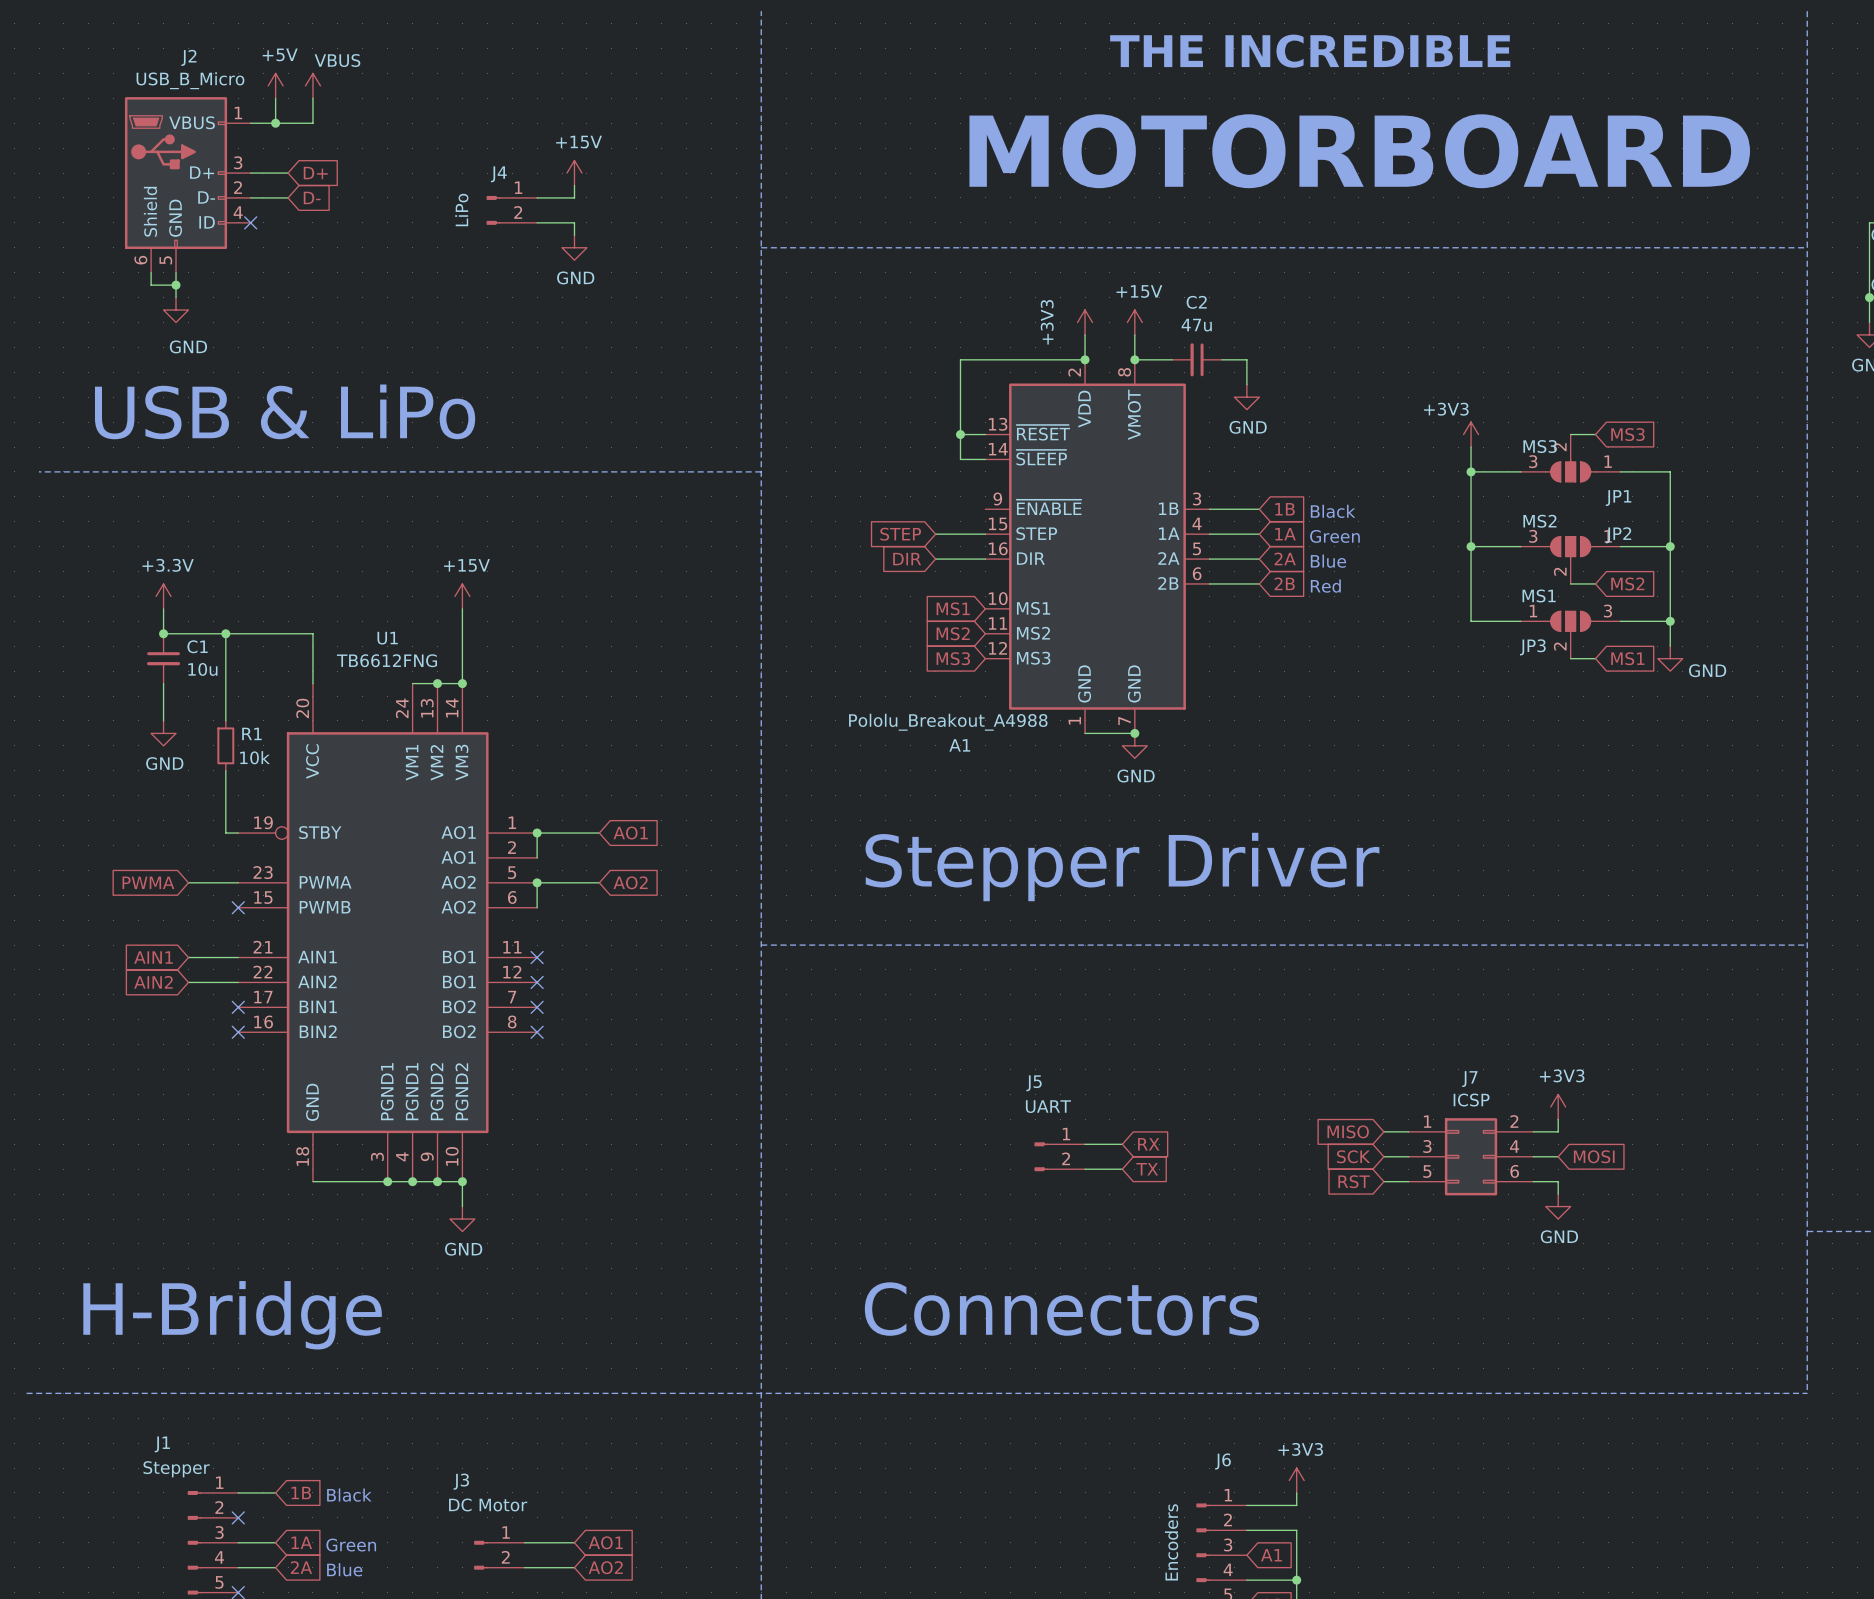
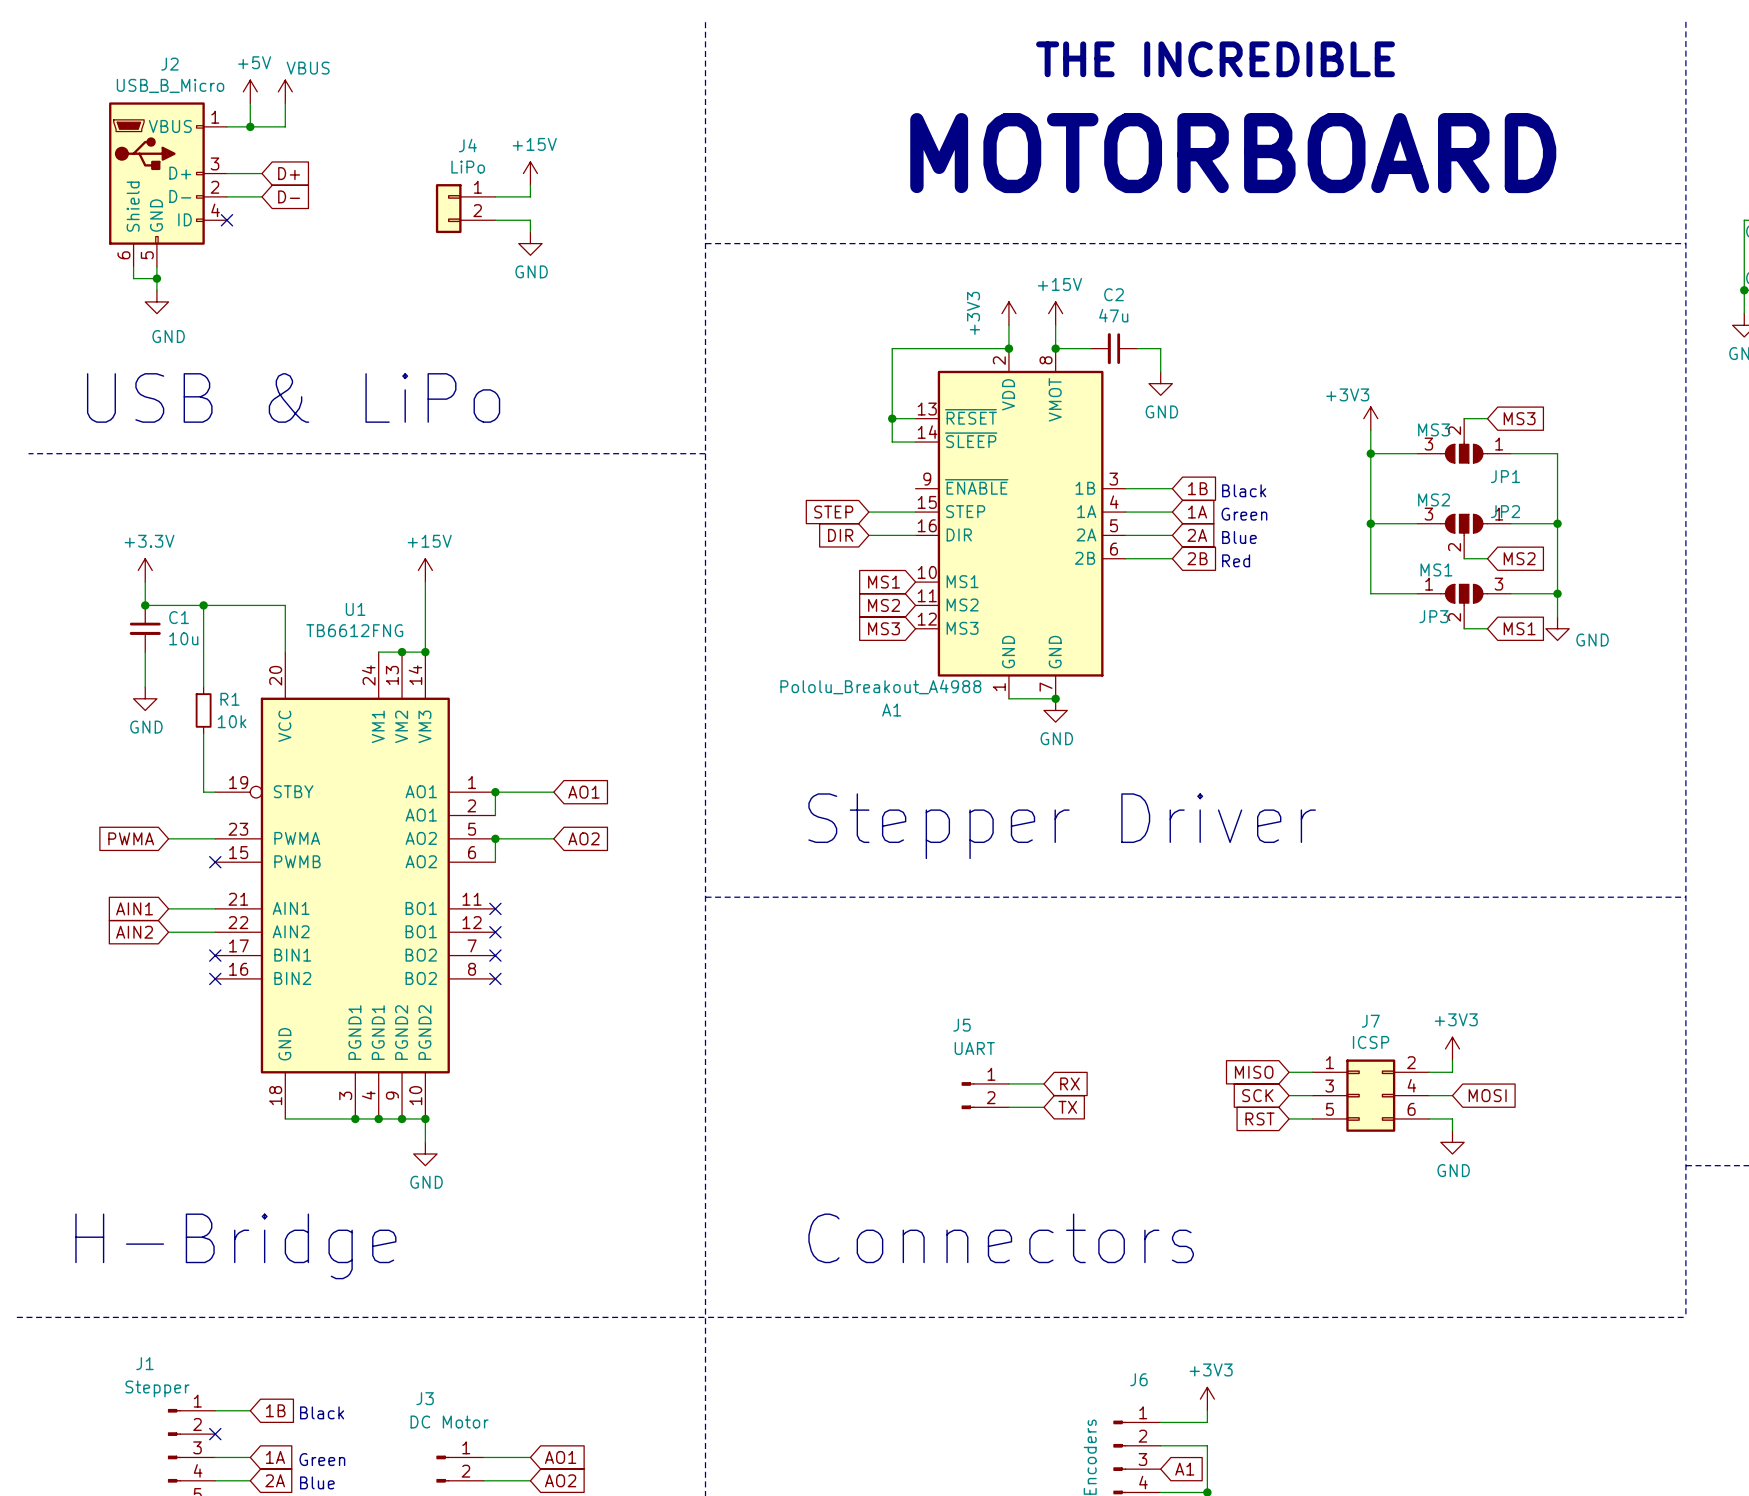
J4 name position: J4 (498, 174) -> J4 (467, 145)
J4 symbol: [486, 195, 538, 225] -> [435, 184, 496, 234]
J4 value position: LiPo (461, 210) -> LiPo (468, 167)

